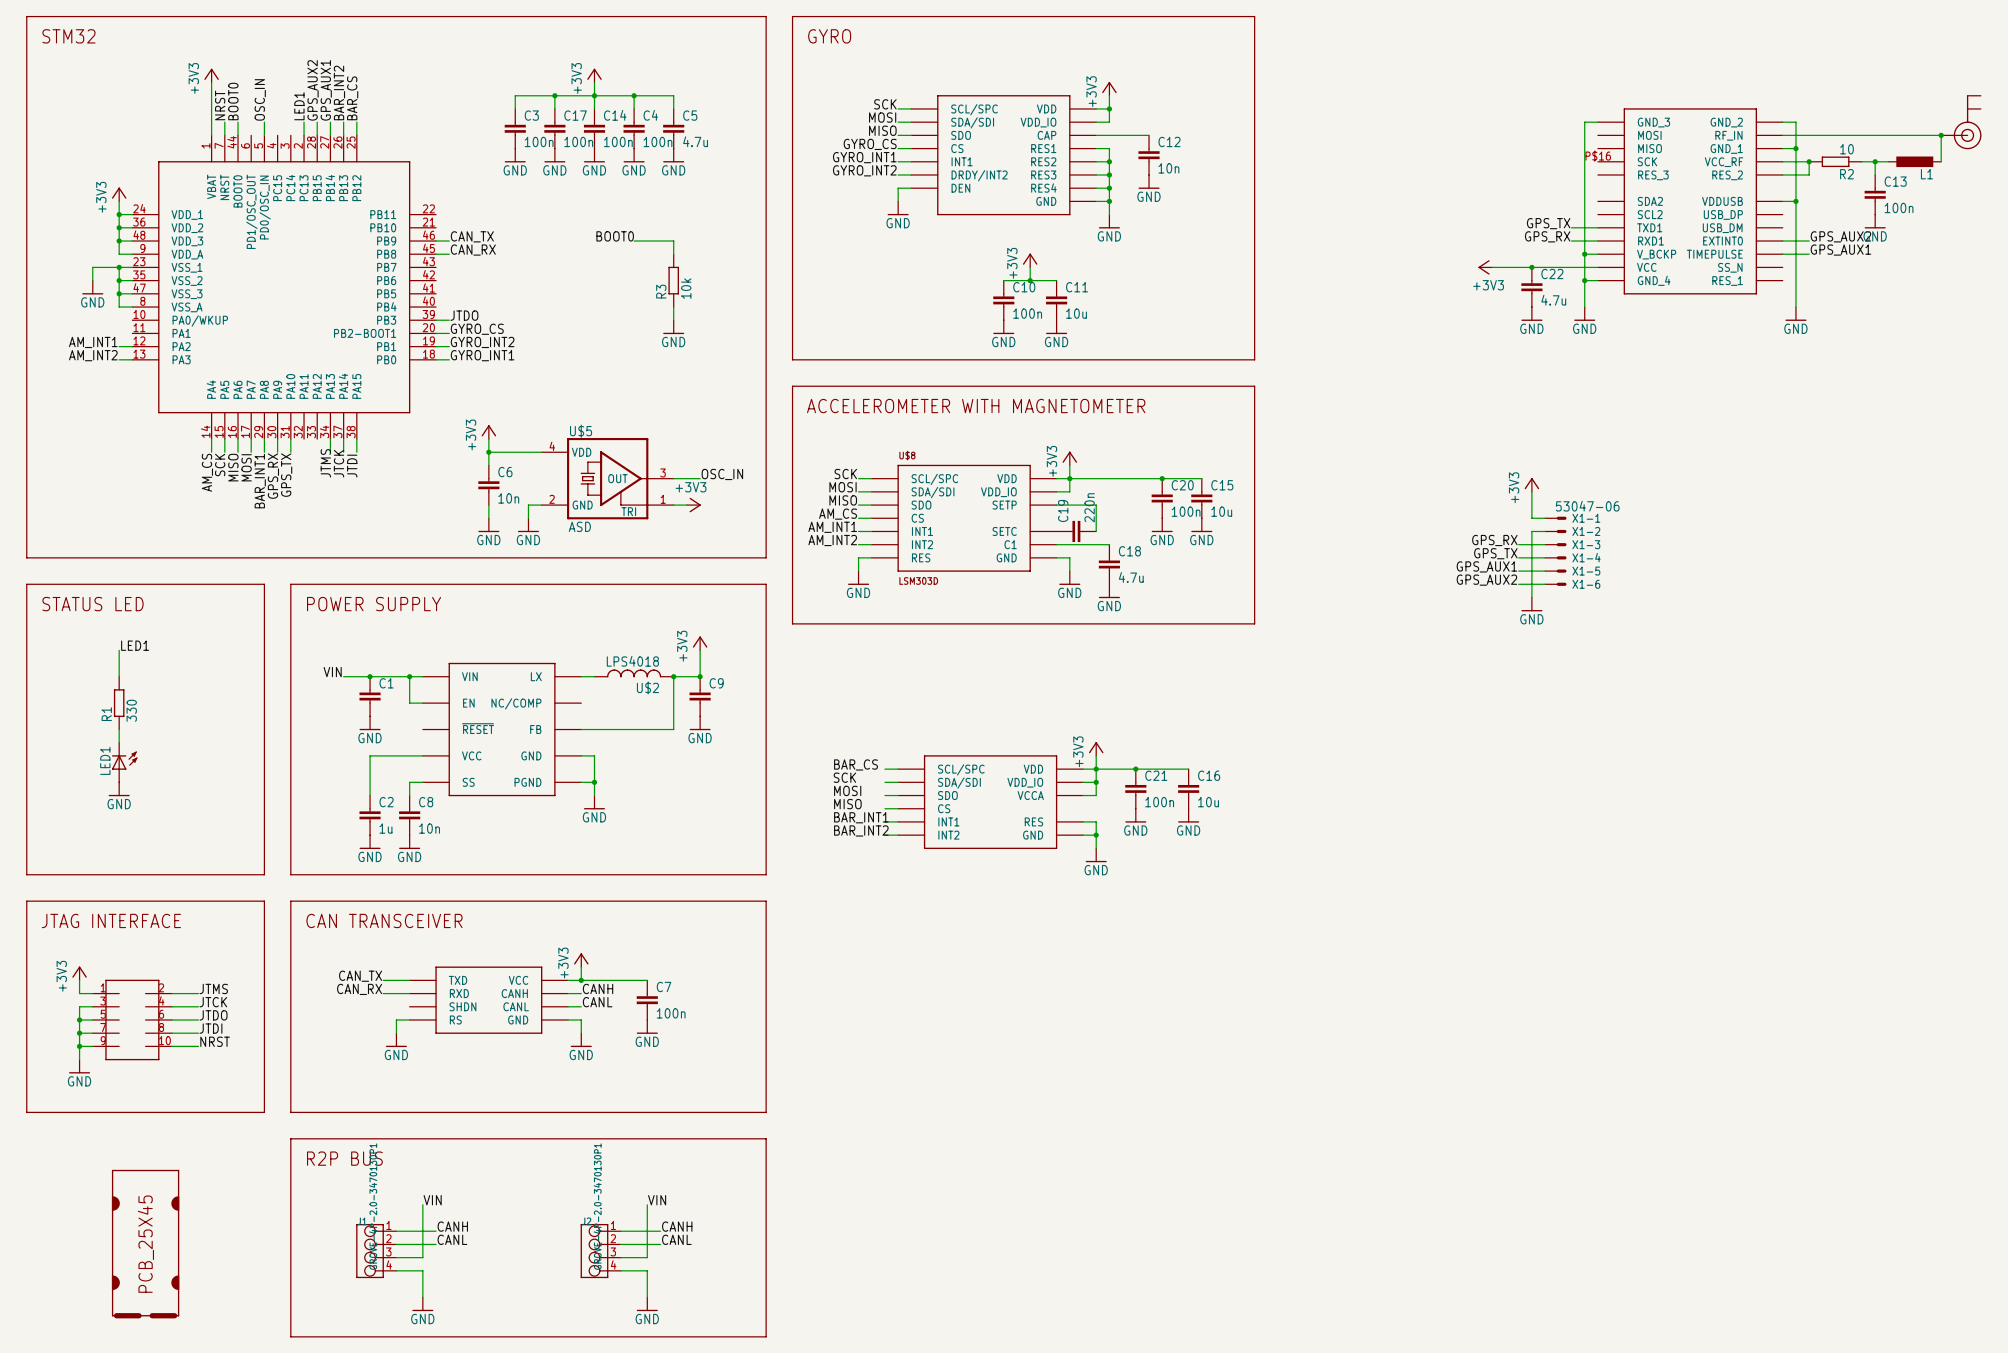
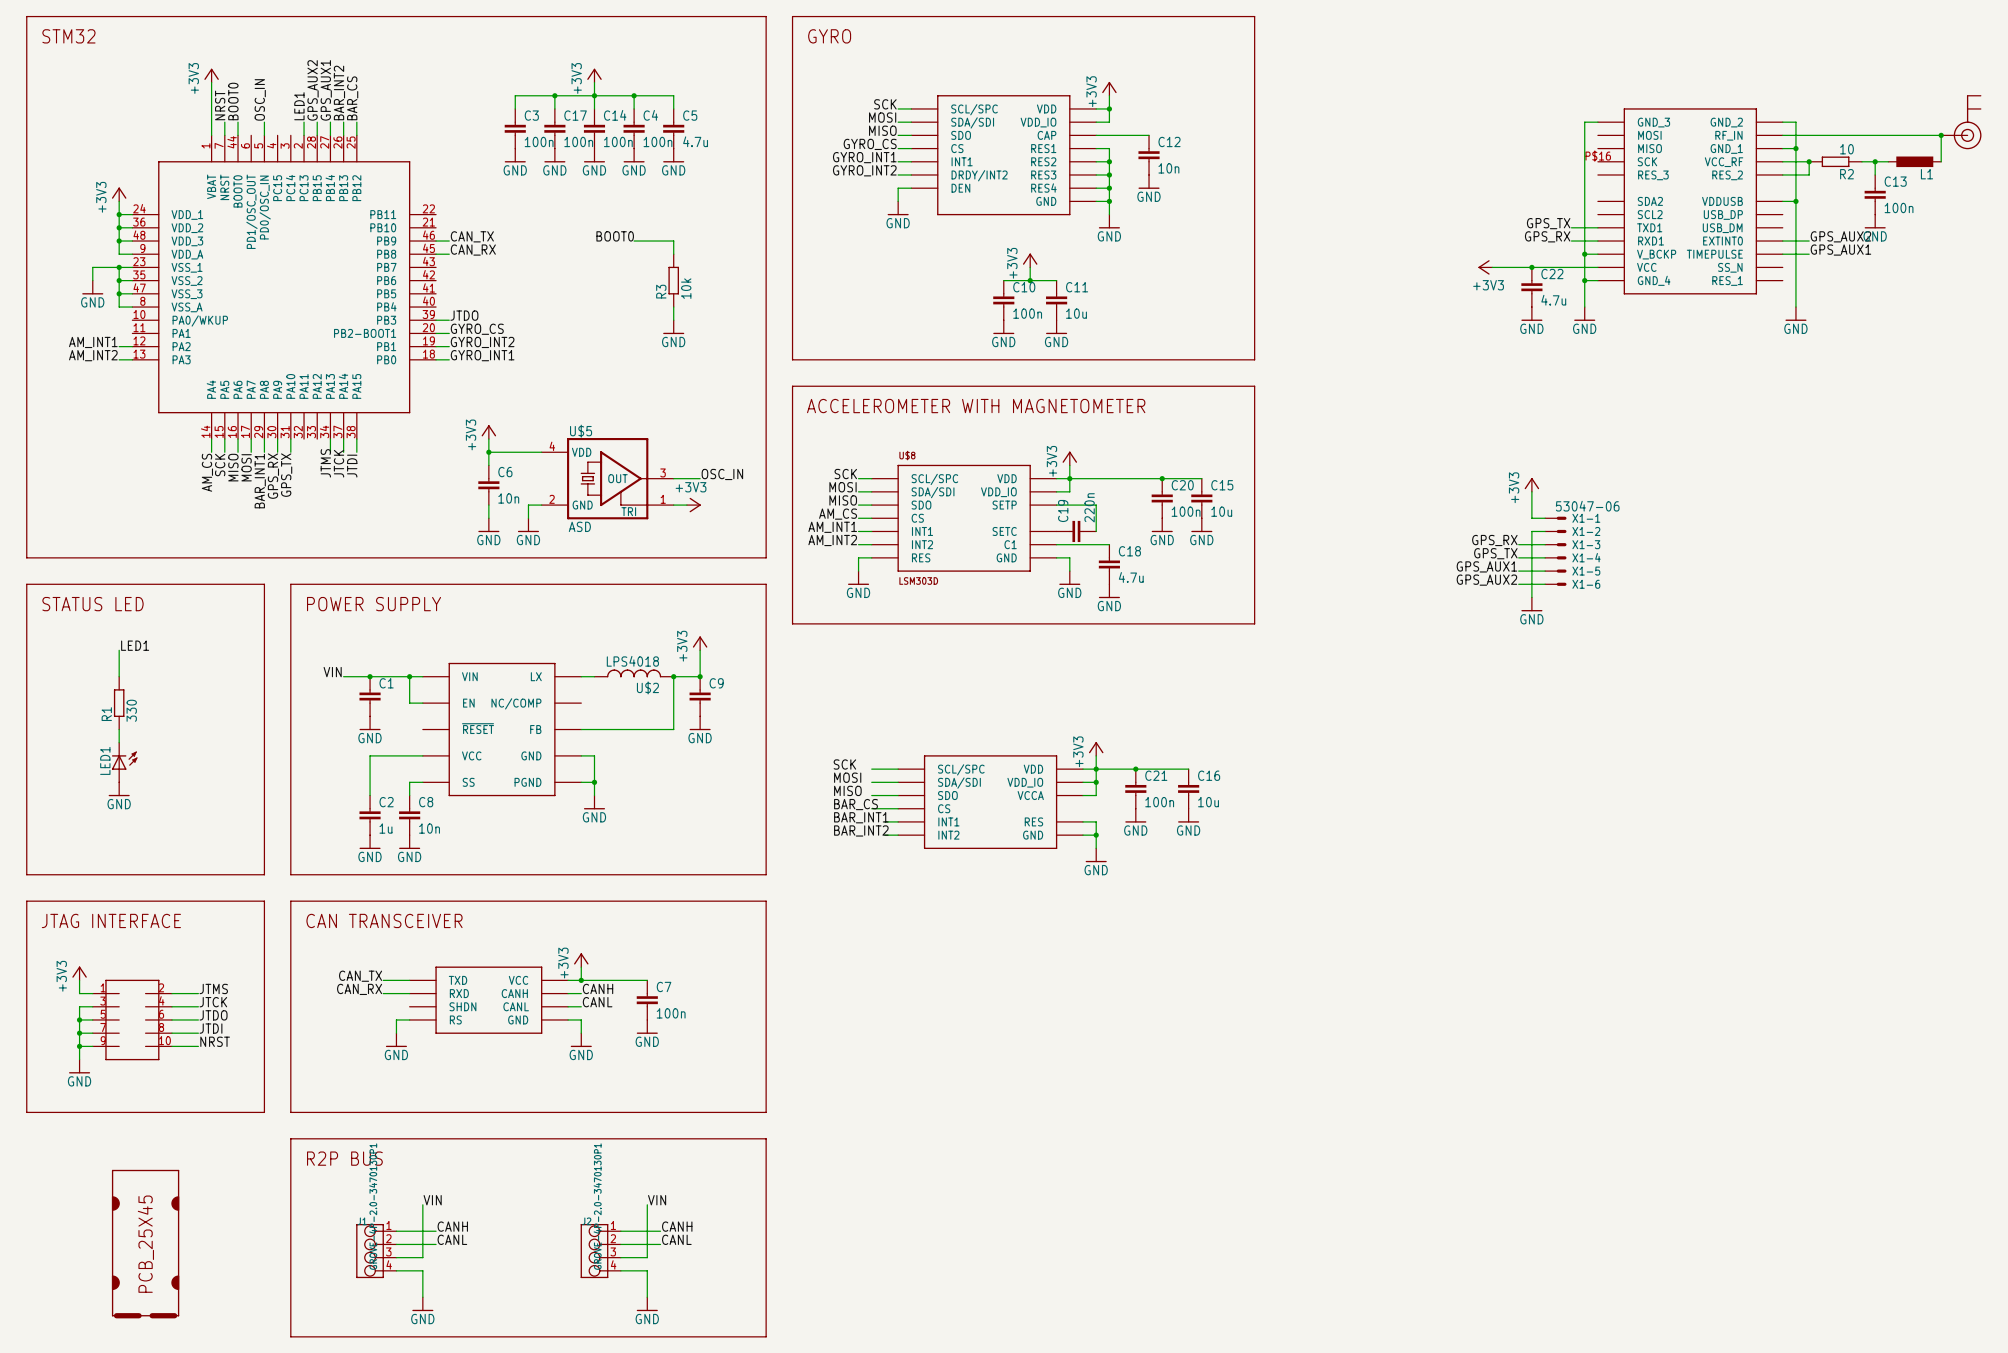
label: BAR_CS (856, 764) -> SCK (844, 764)
wire: none -> (871, 769) (884, 769)
label: SCK (844, 777) -> MOSI (847, 777)
wire: none -> (871, 782) (884, 782)
label: MOSI (847, 790) -> MISO (847, 790)
wire: none -> (871, 795) (884, 795)
label: MISO (847, 804) -> BAR_CS (856, 804)
wire: none -> (871, 808) (884, 808)

